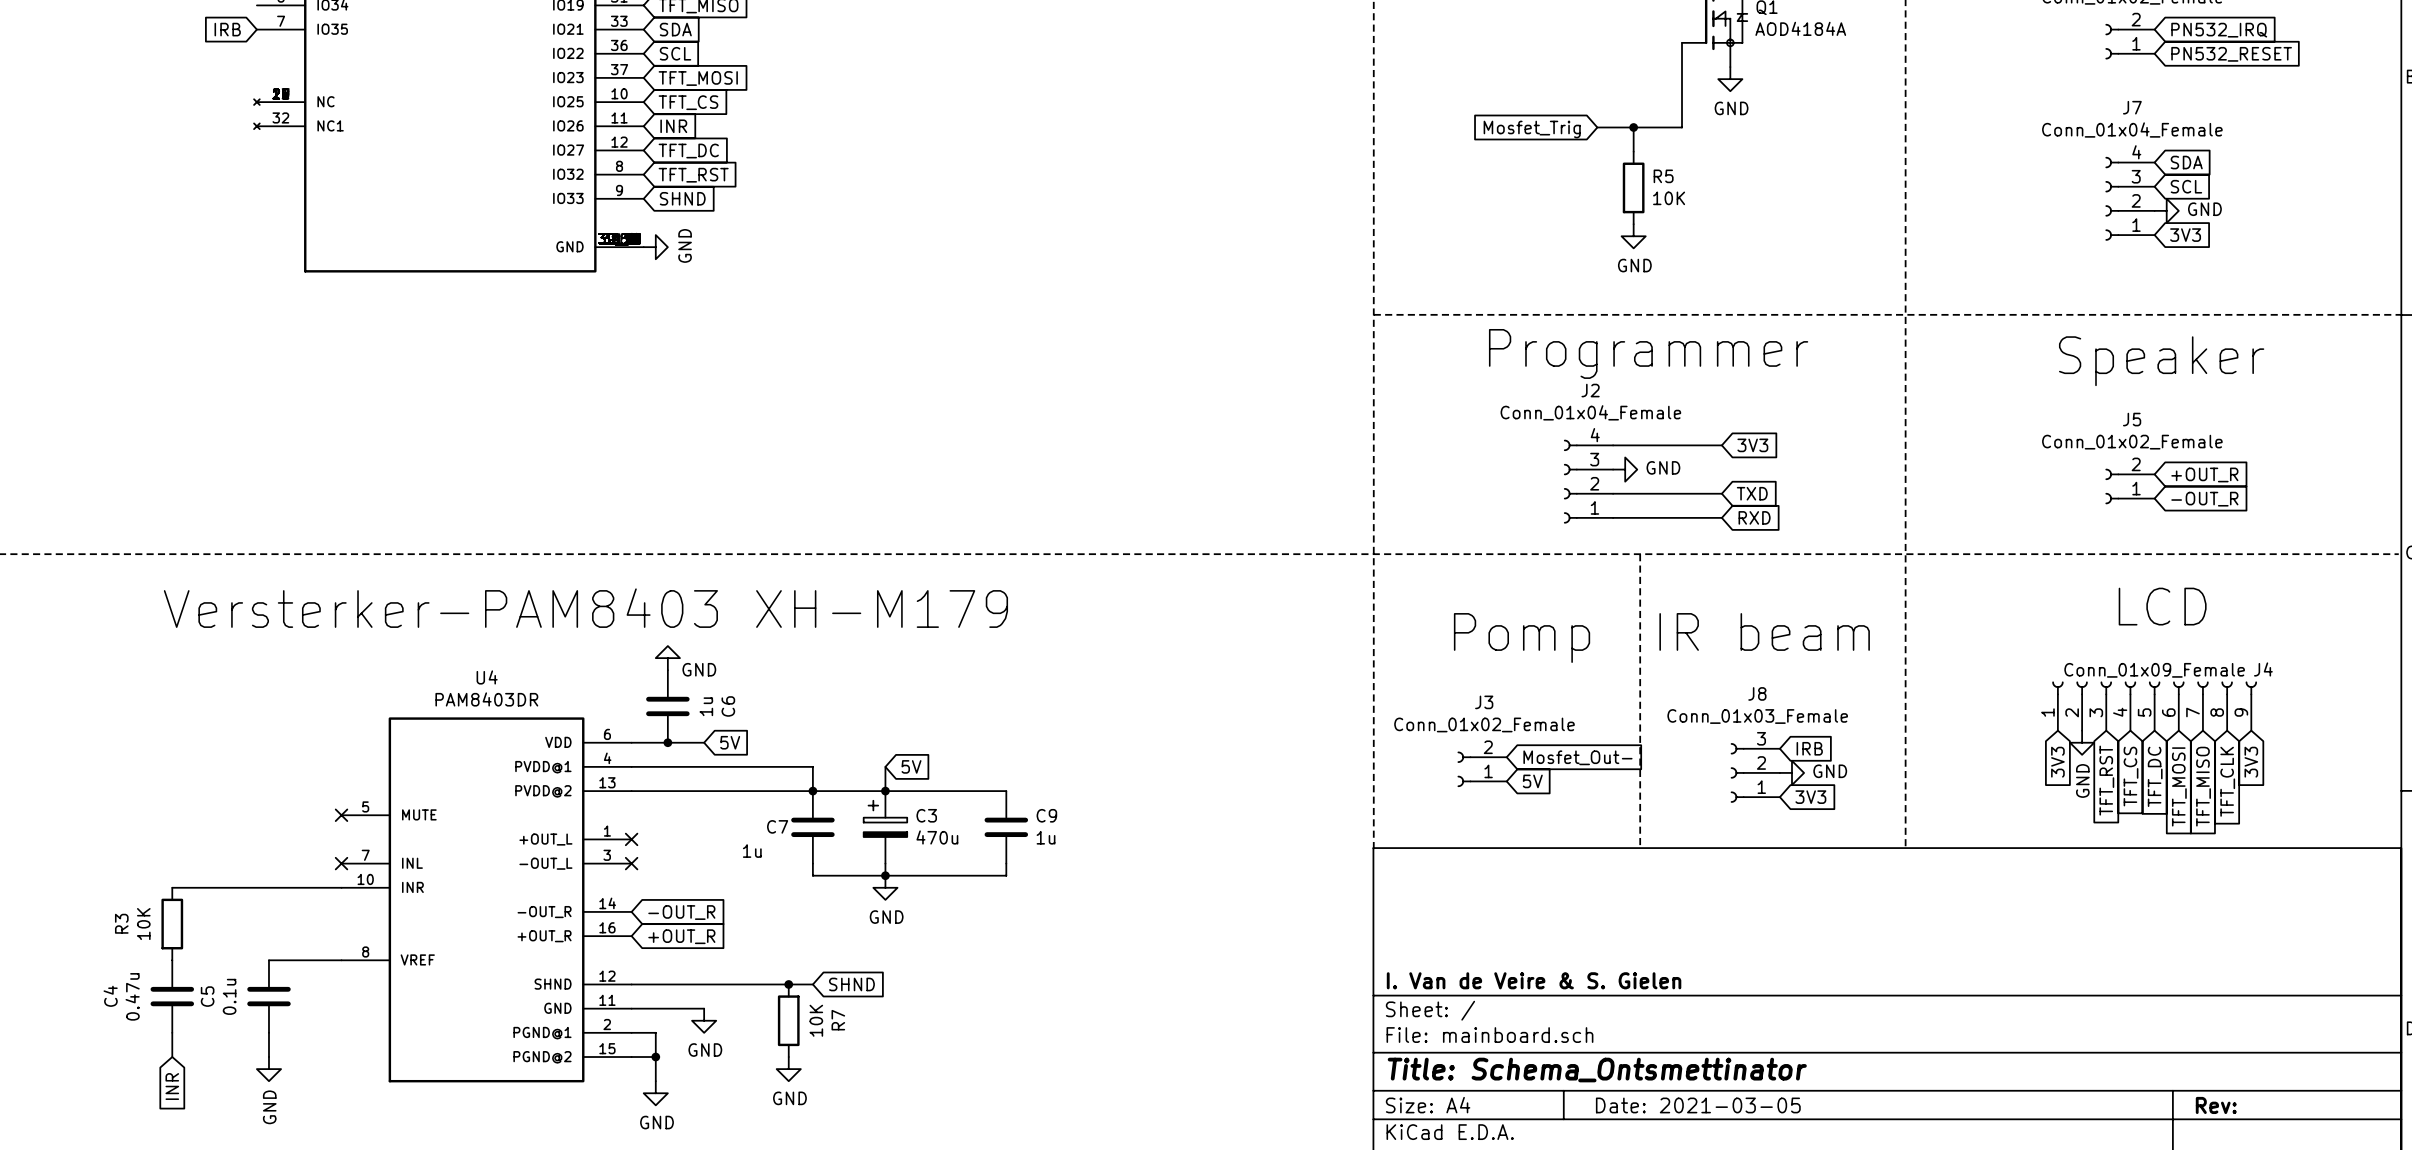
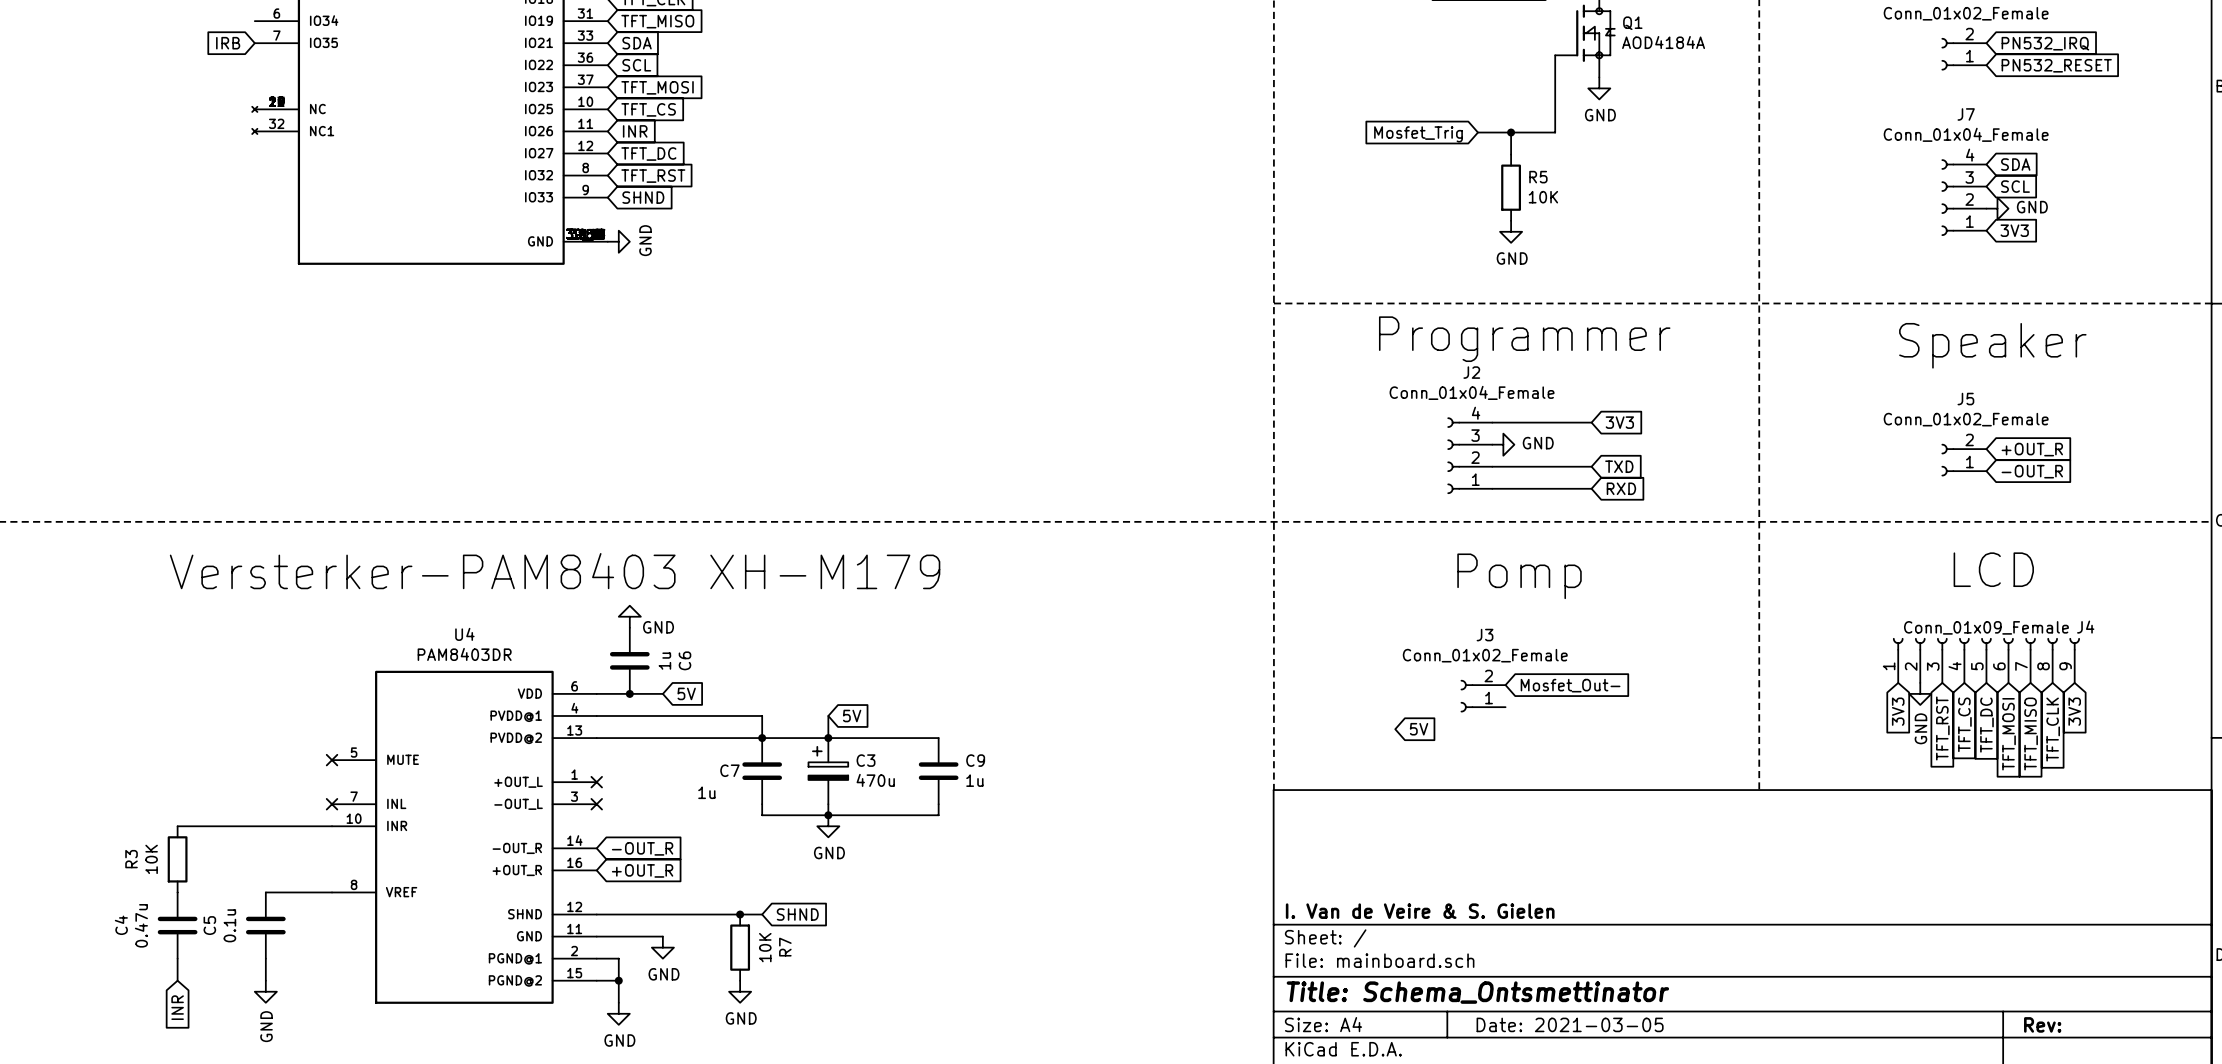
line: (1640, 554) (1640, 848) -> none
text: IR beam (1764, 631) -> none
text position: Pomp (1522, 638) -> Pomp (1519, 576)
global label: IRB (1809, 748) -> none
global label position: Mosfet_Out- (1577, 757) -> Mosfet_Out- (1570, 685)
J3 position: (1482, 769) -> (1483, 696)
J8: Conn_01x03_Female (1755, 772) -> none
power symbol: GND (1791, 772) -> none
global label: 3V3 (1810, 797) -> none

